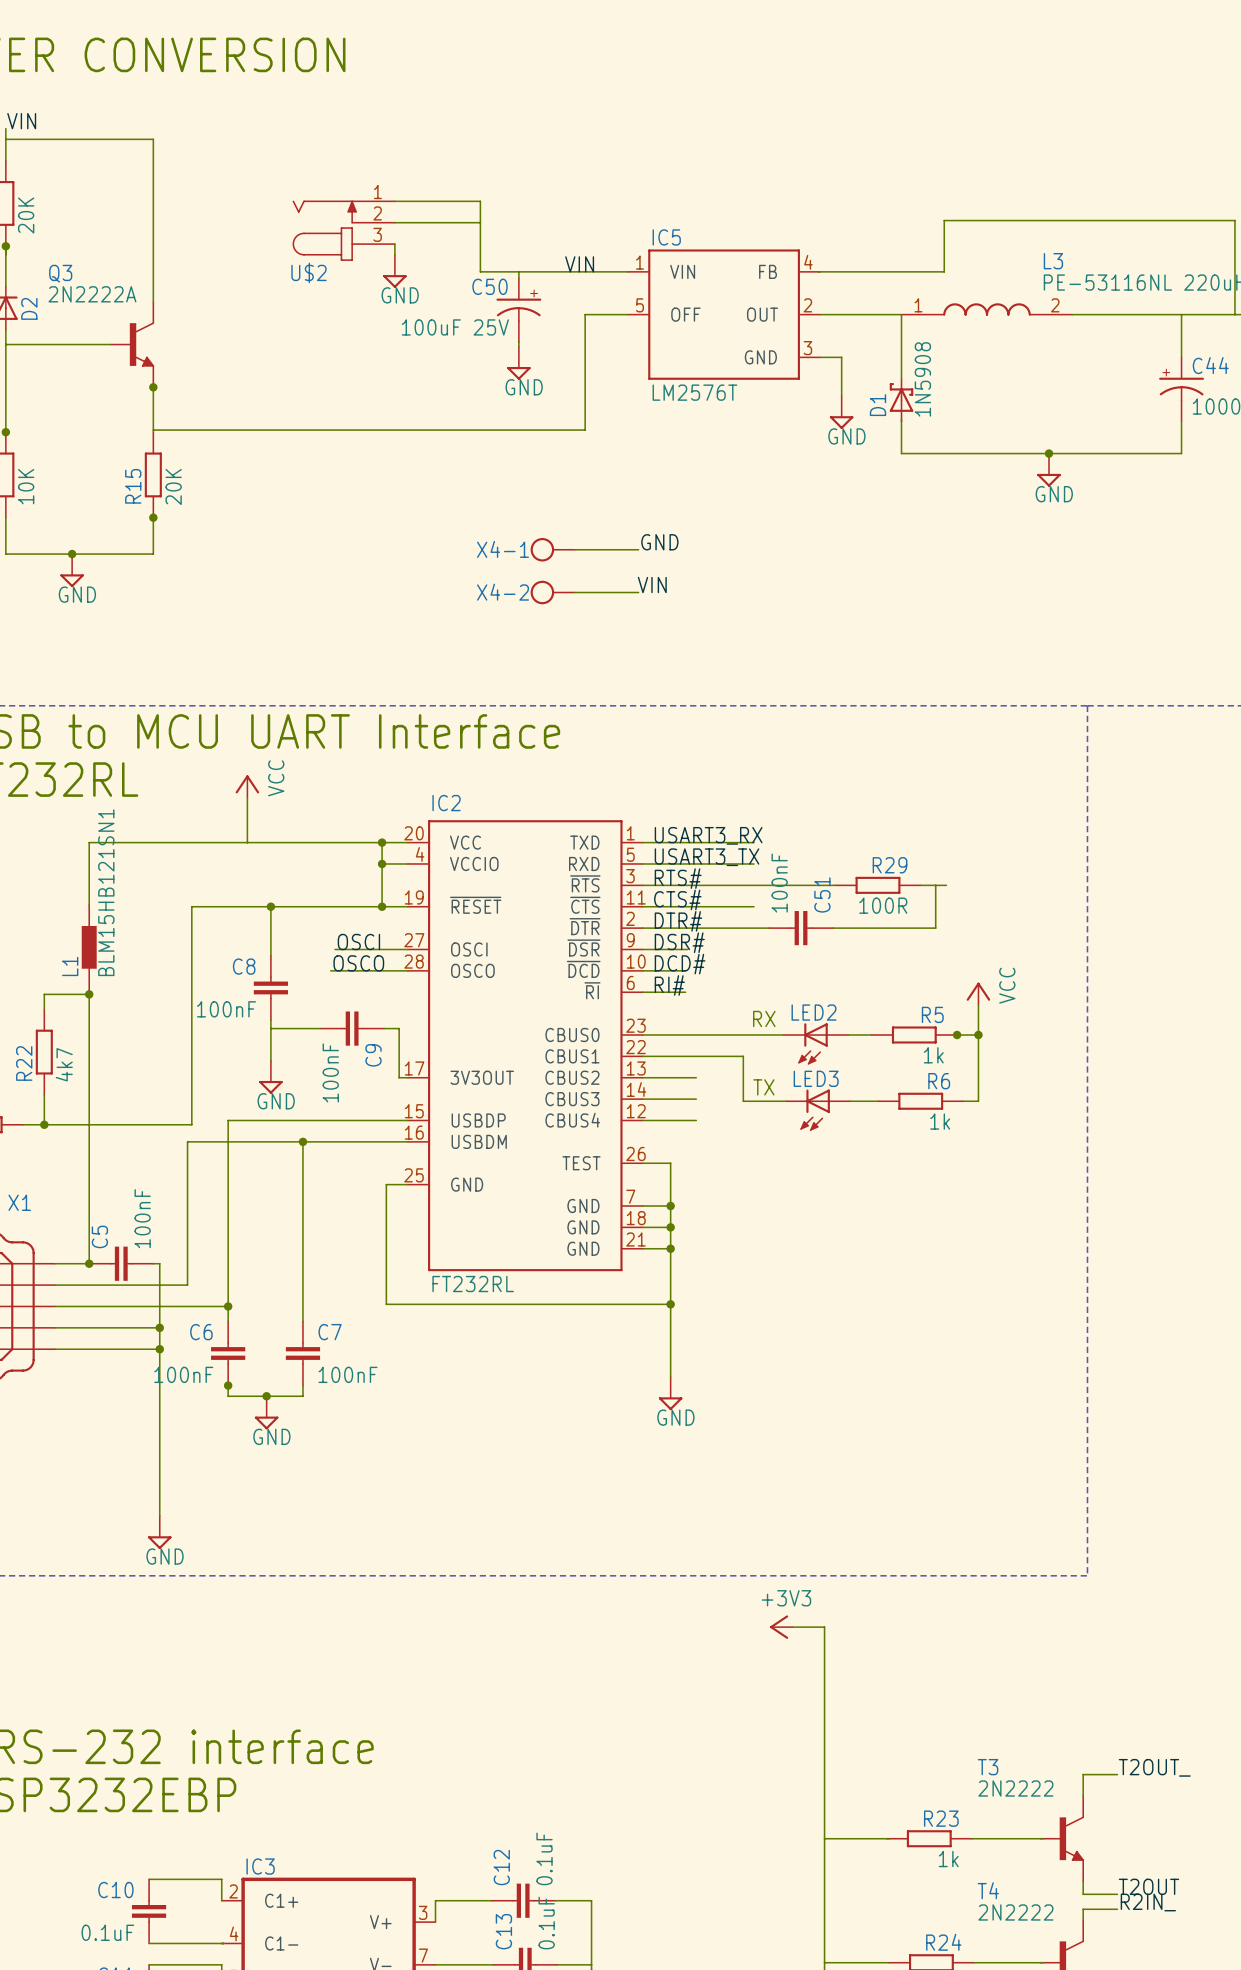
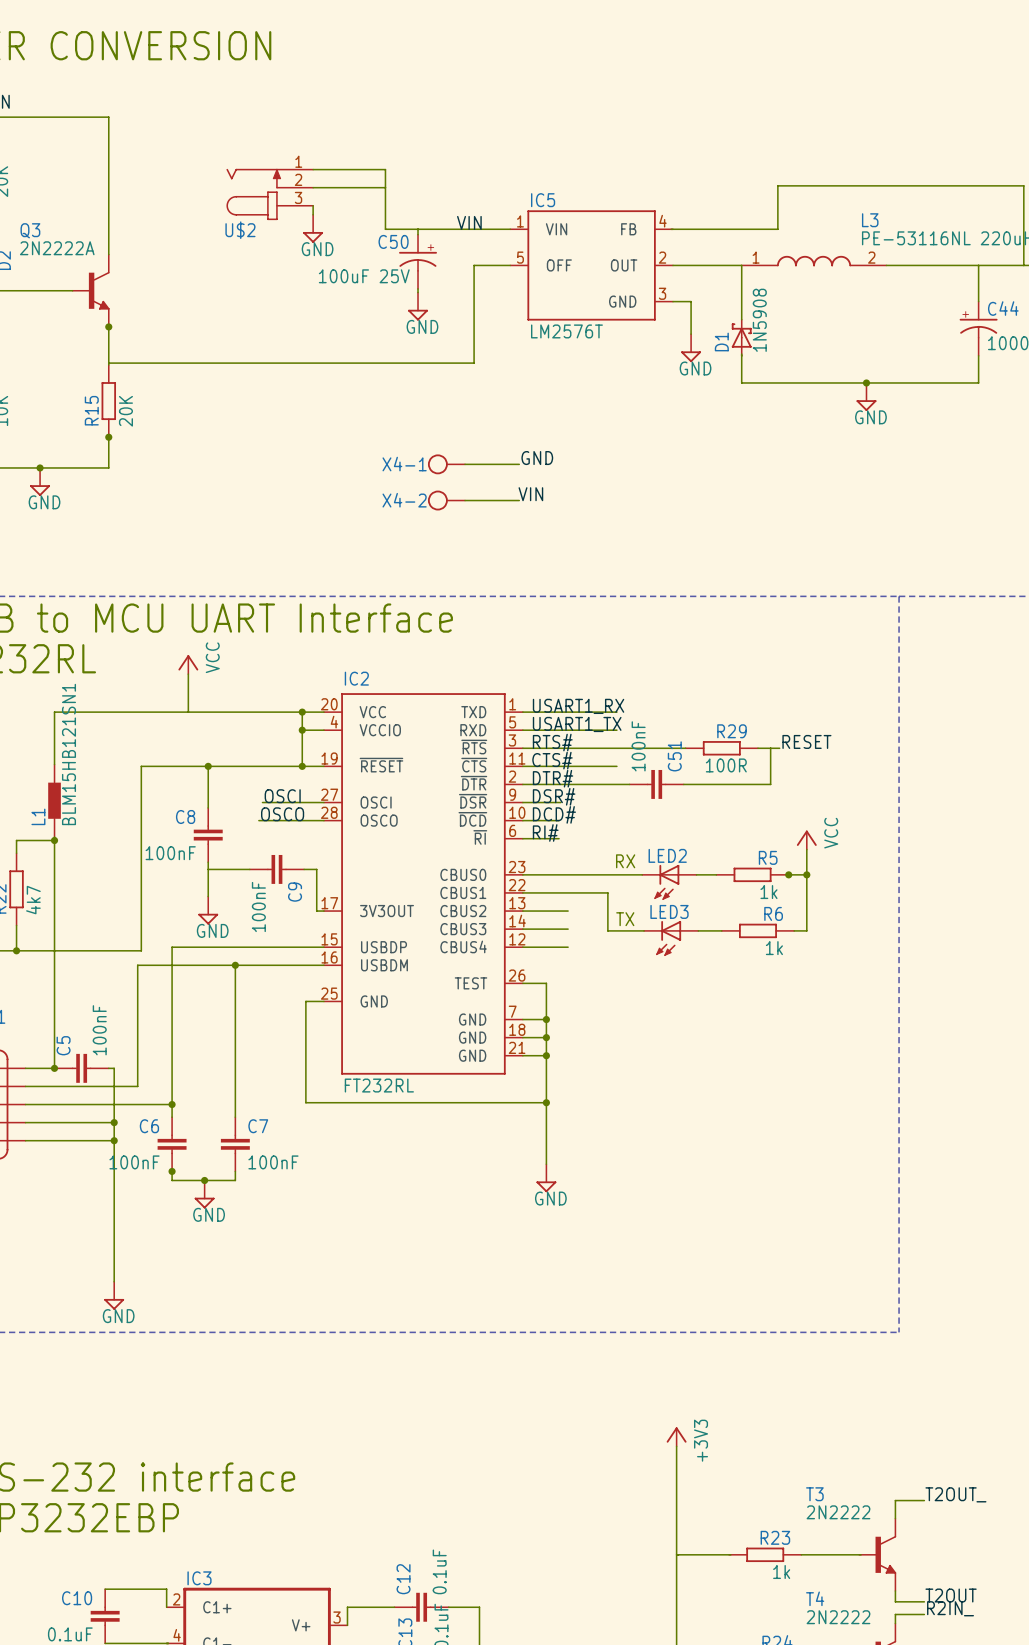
label: USART3_RX (708, 835) -> USART1_RX (578, 706)
label: USART3_TX (707, 857) -> USART1_TX (577, 724)
label: none -> RESET (806, 741)
power symbol rotation: 0° (779, 1627) -> 90° clockwise (676, 1435)
power symbol position: +3V3 (781, 1627) -> +3V3 (676, 1436)
wire: (792, 1627) (824, 1627) (824, 1710) -> none

